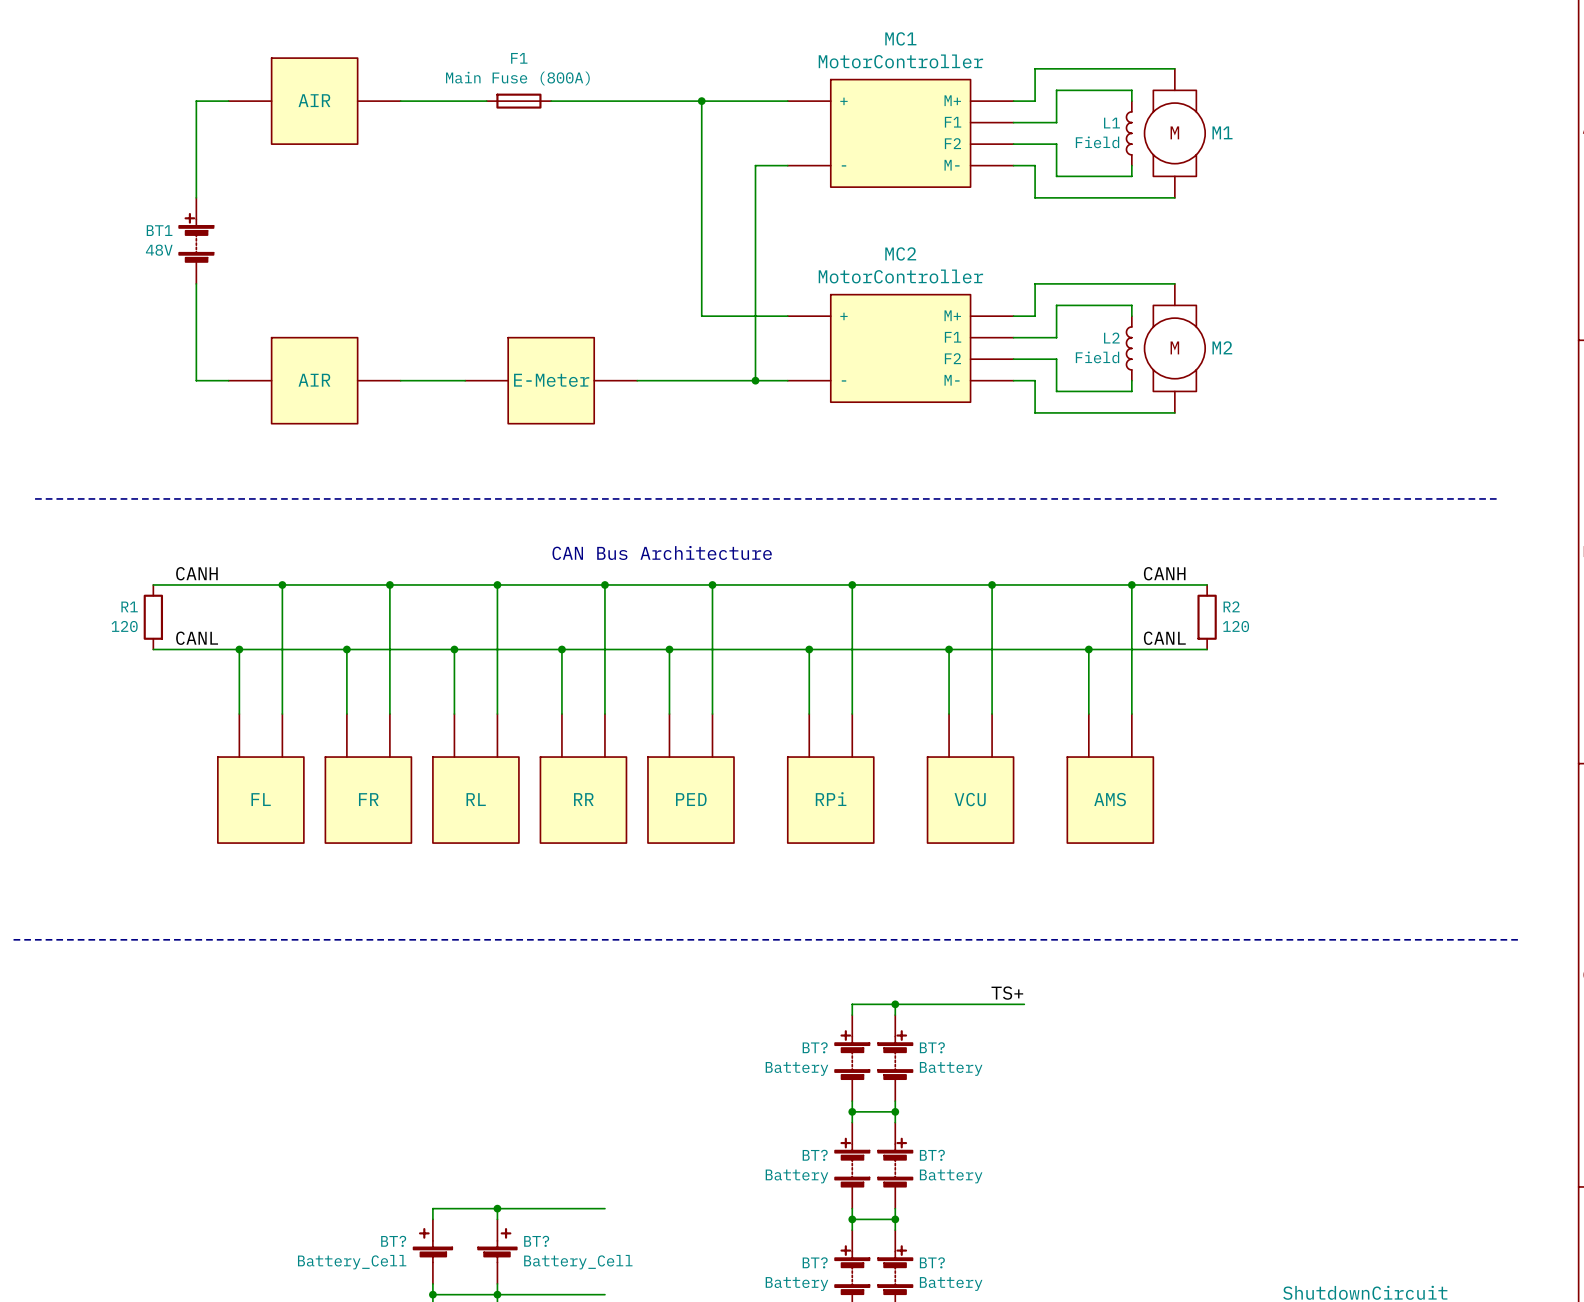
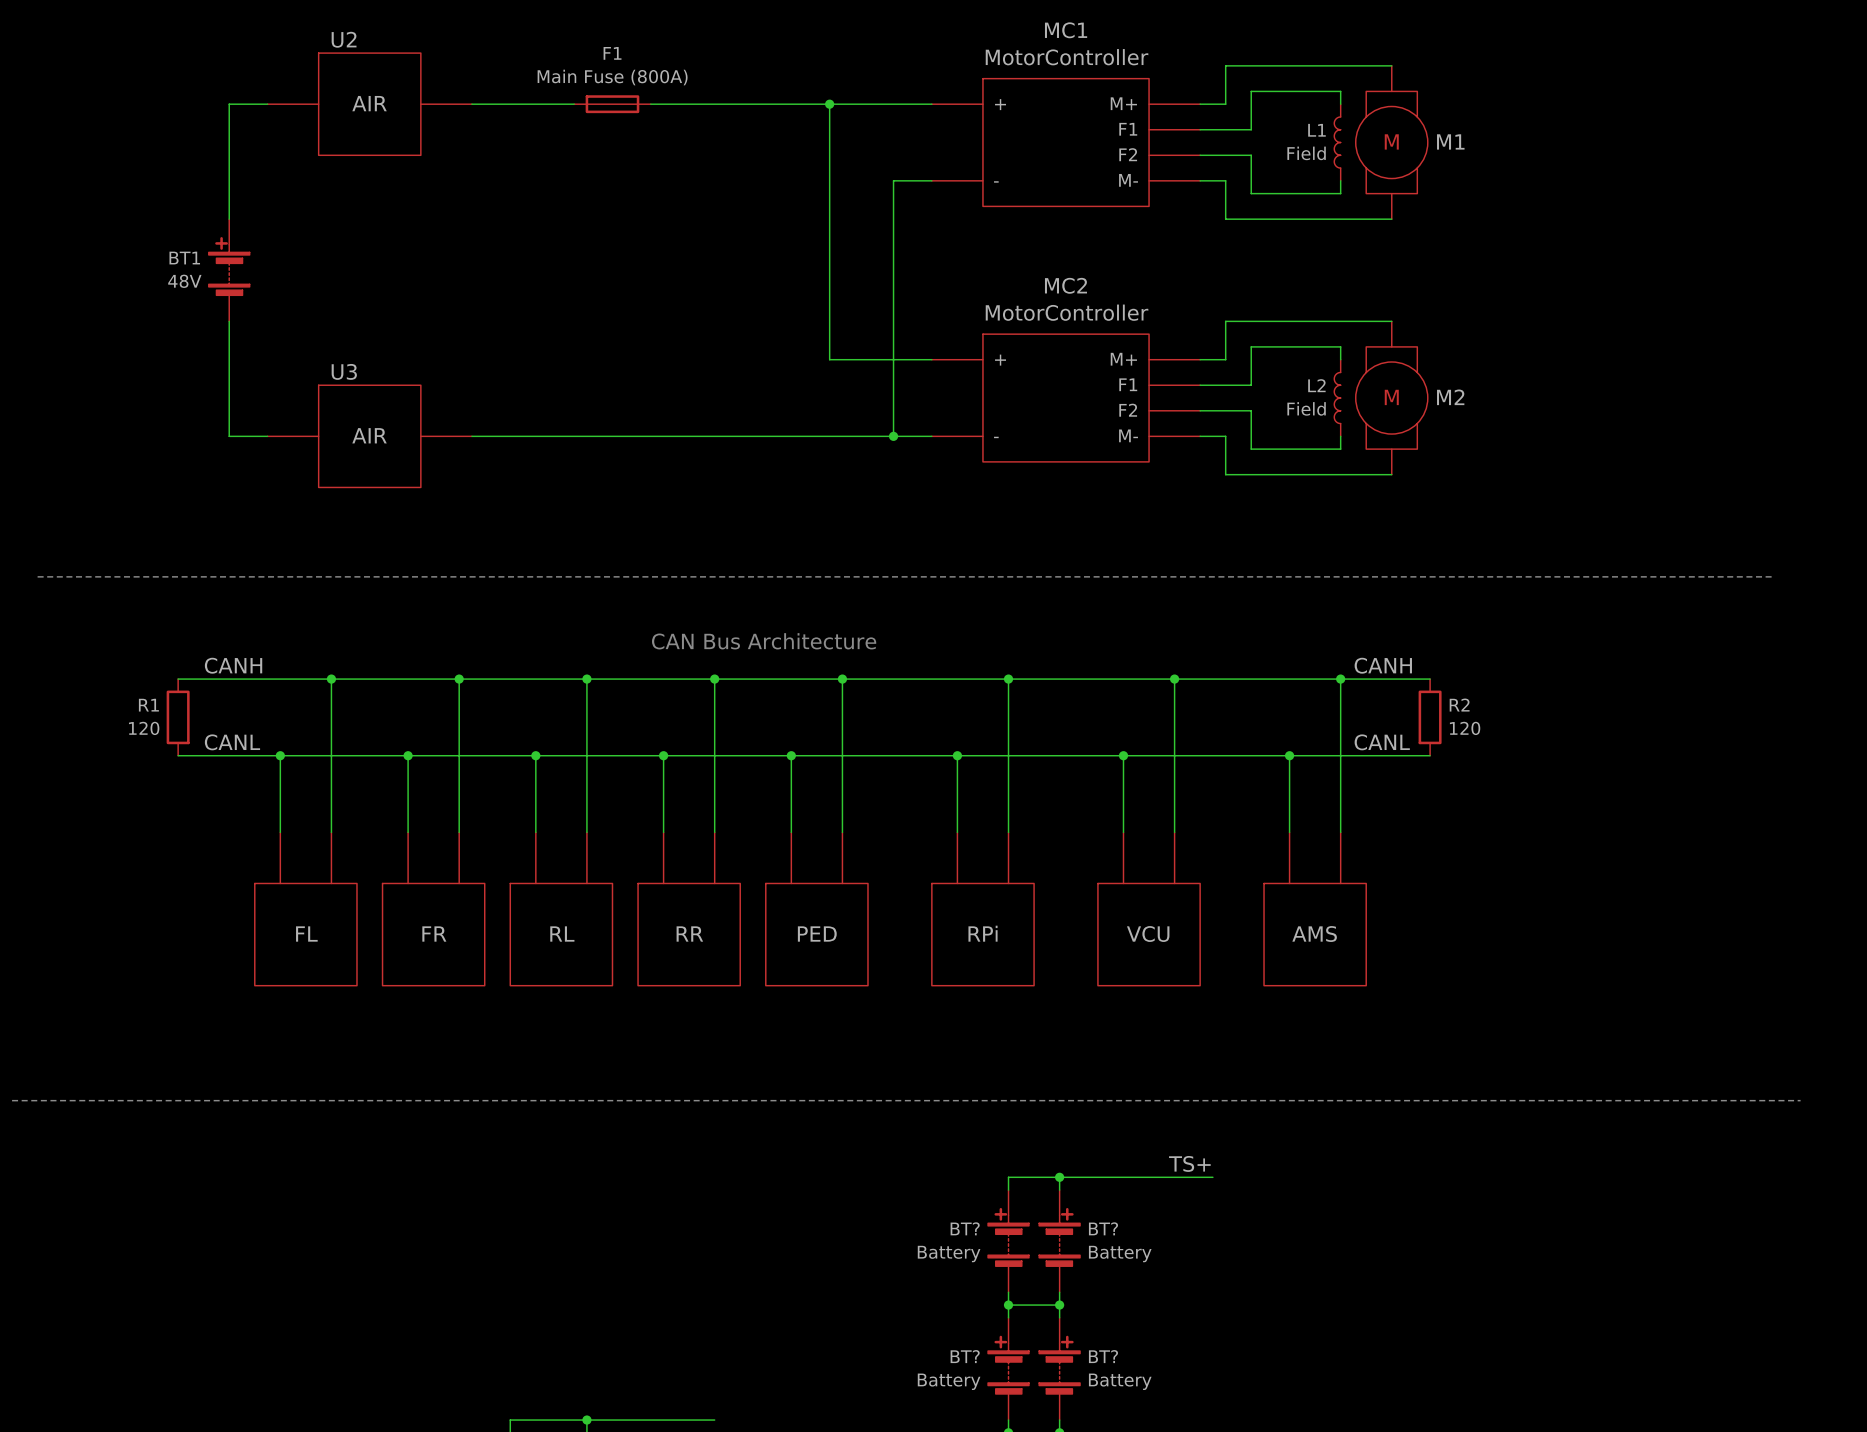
U2 name: none -> U2 (344, 39)
U3 name: none -> U3 (344, 371)
part: E-Meter (551, 380) -> none

